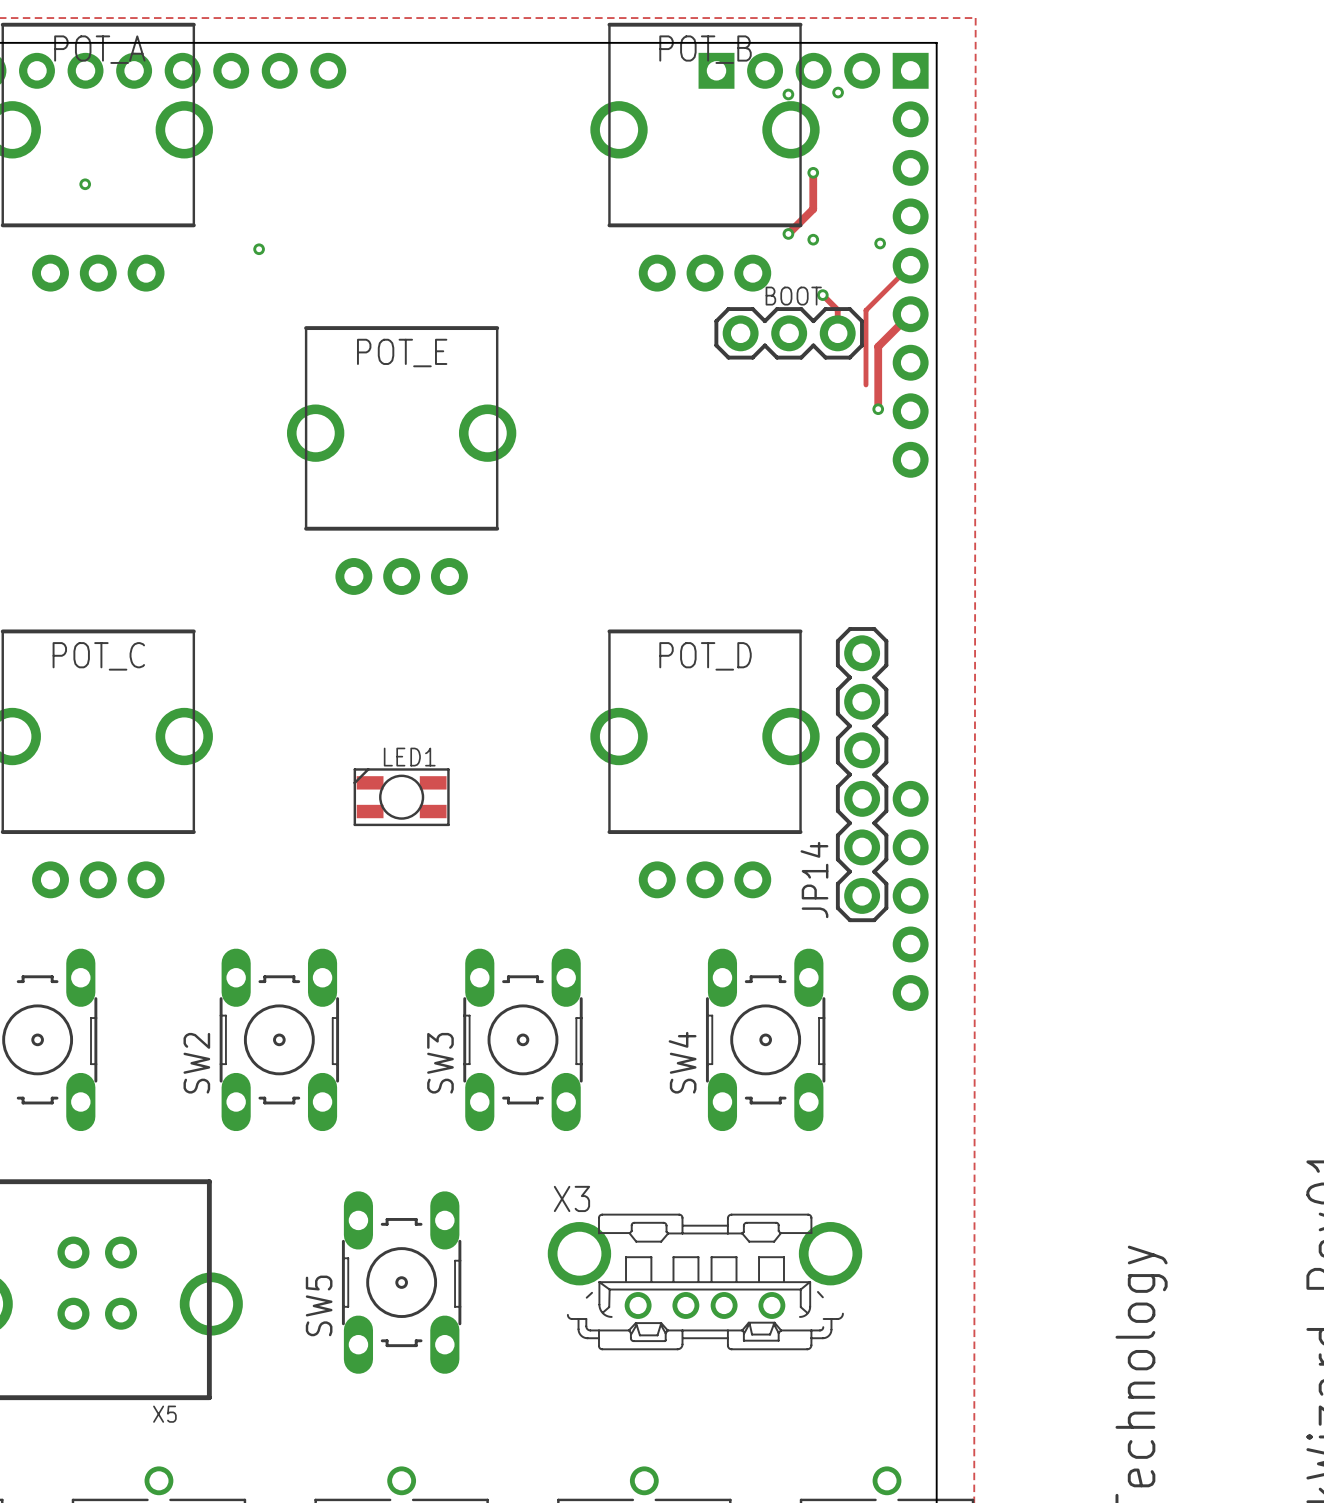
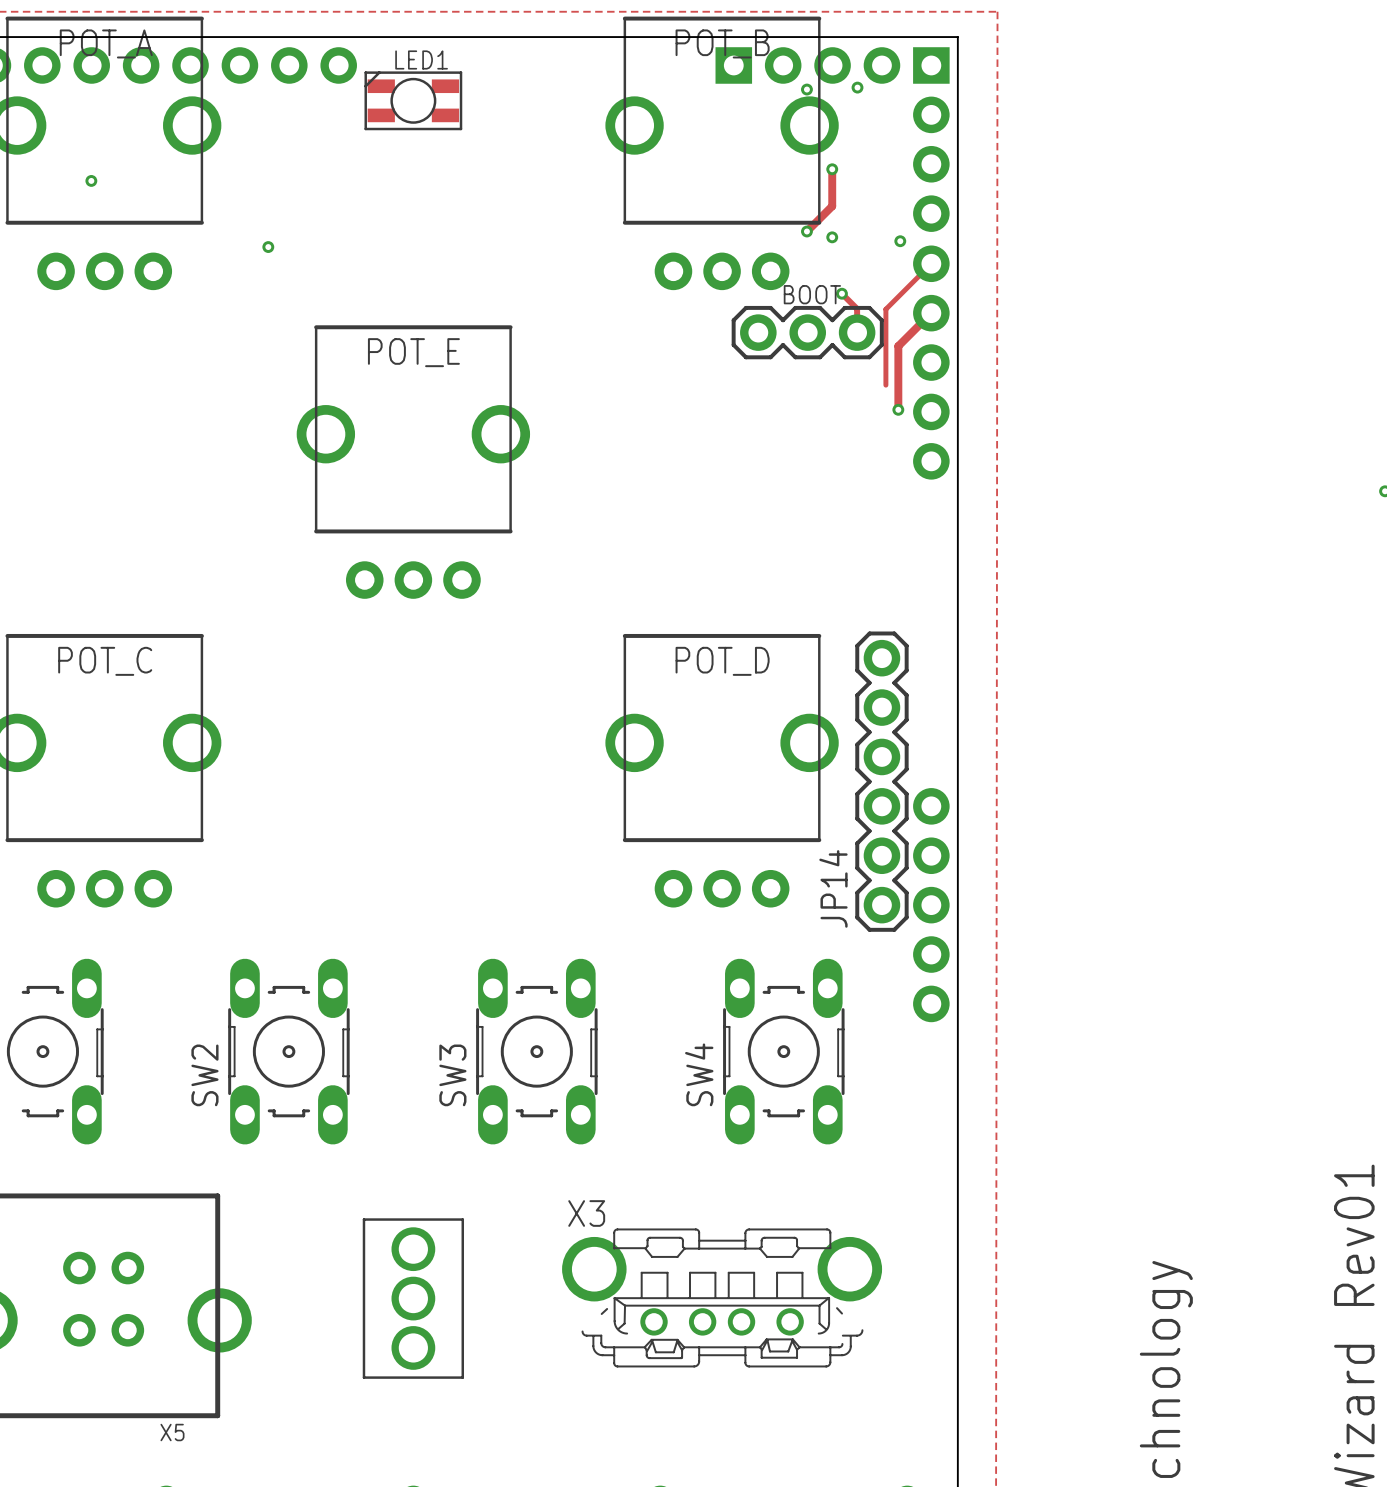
LED1 position: (401, 797) -> (413, 100)
SW5: (401, 1282) -> none
part: none -> (413, 1298)

